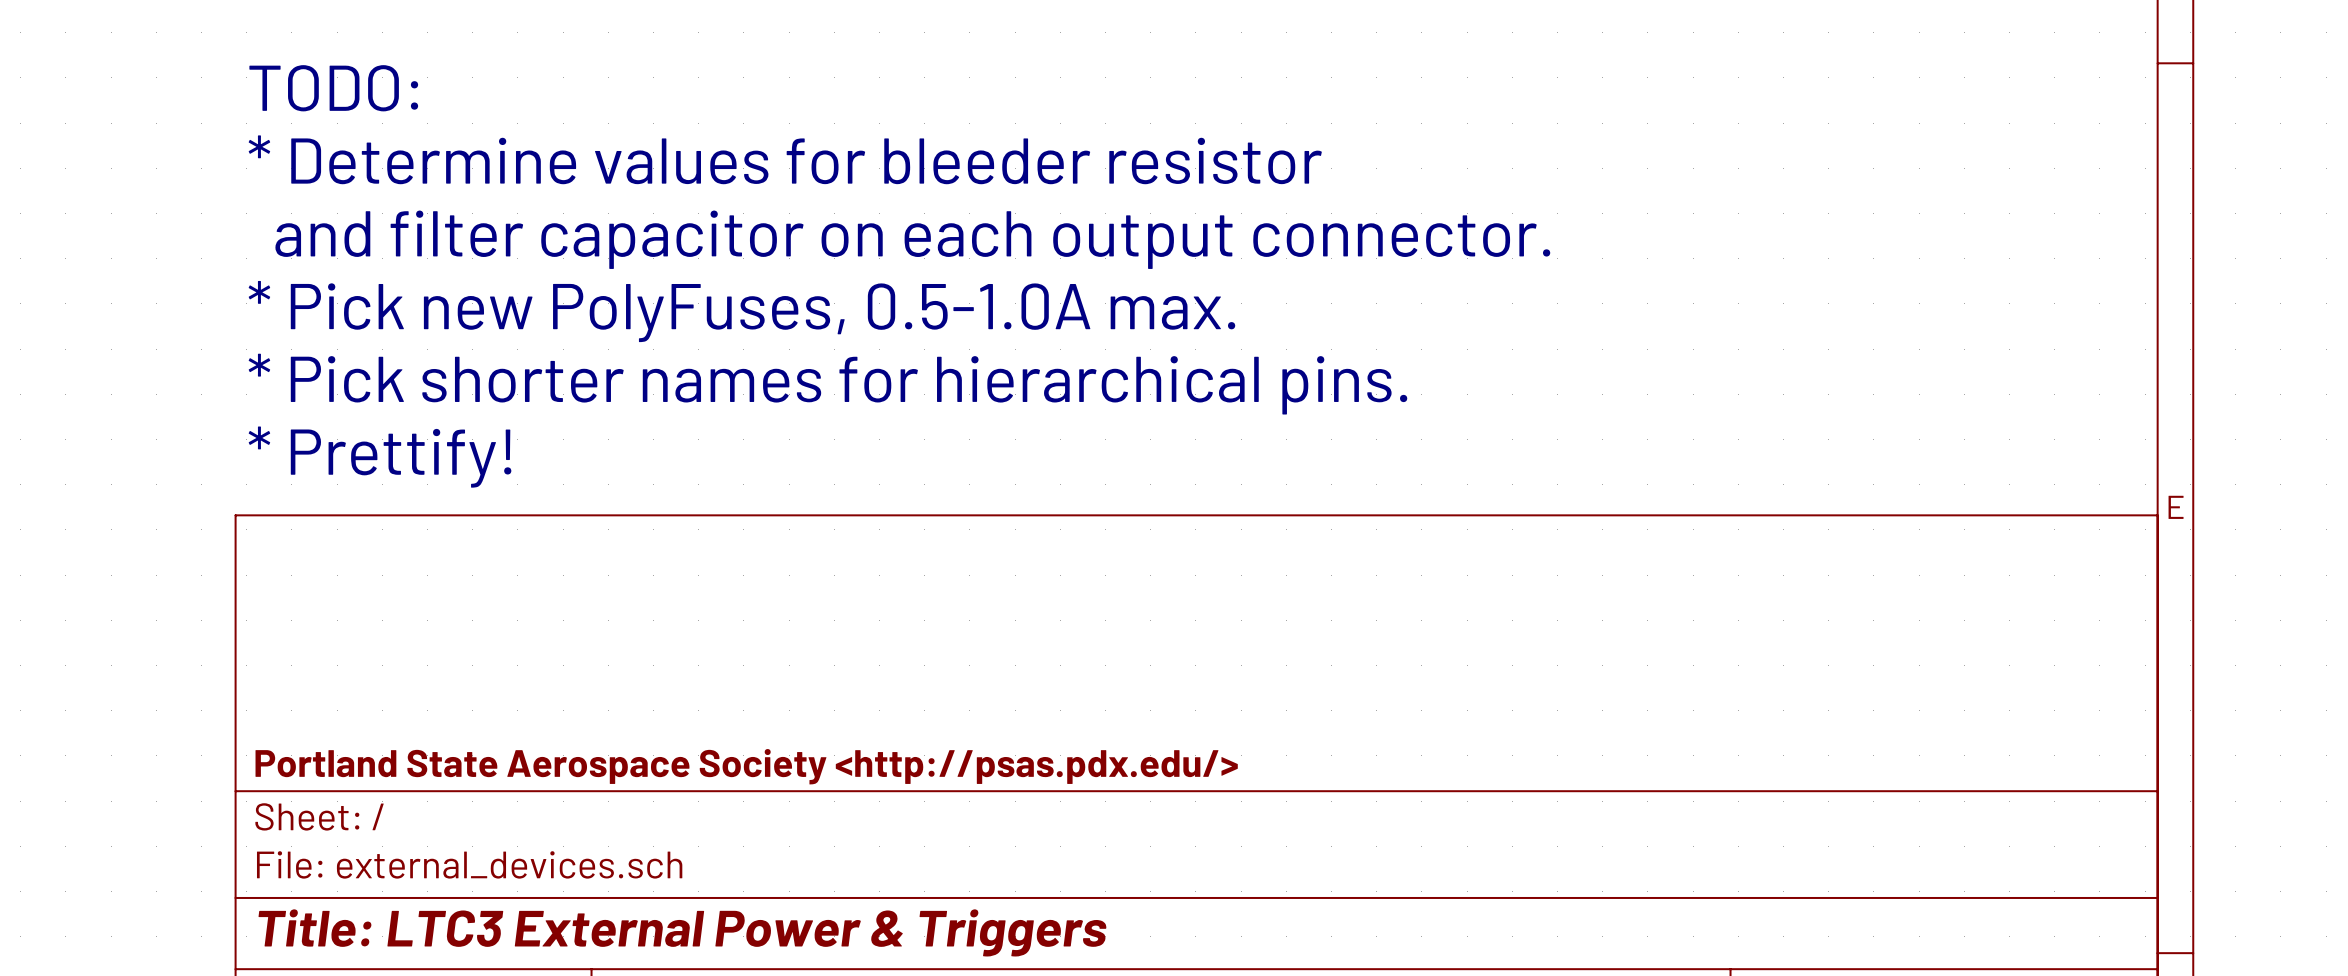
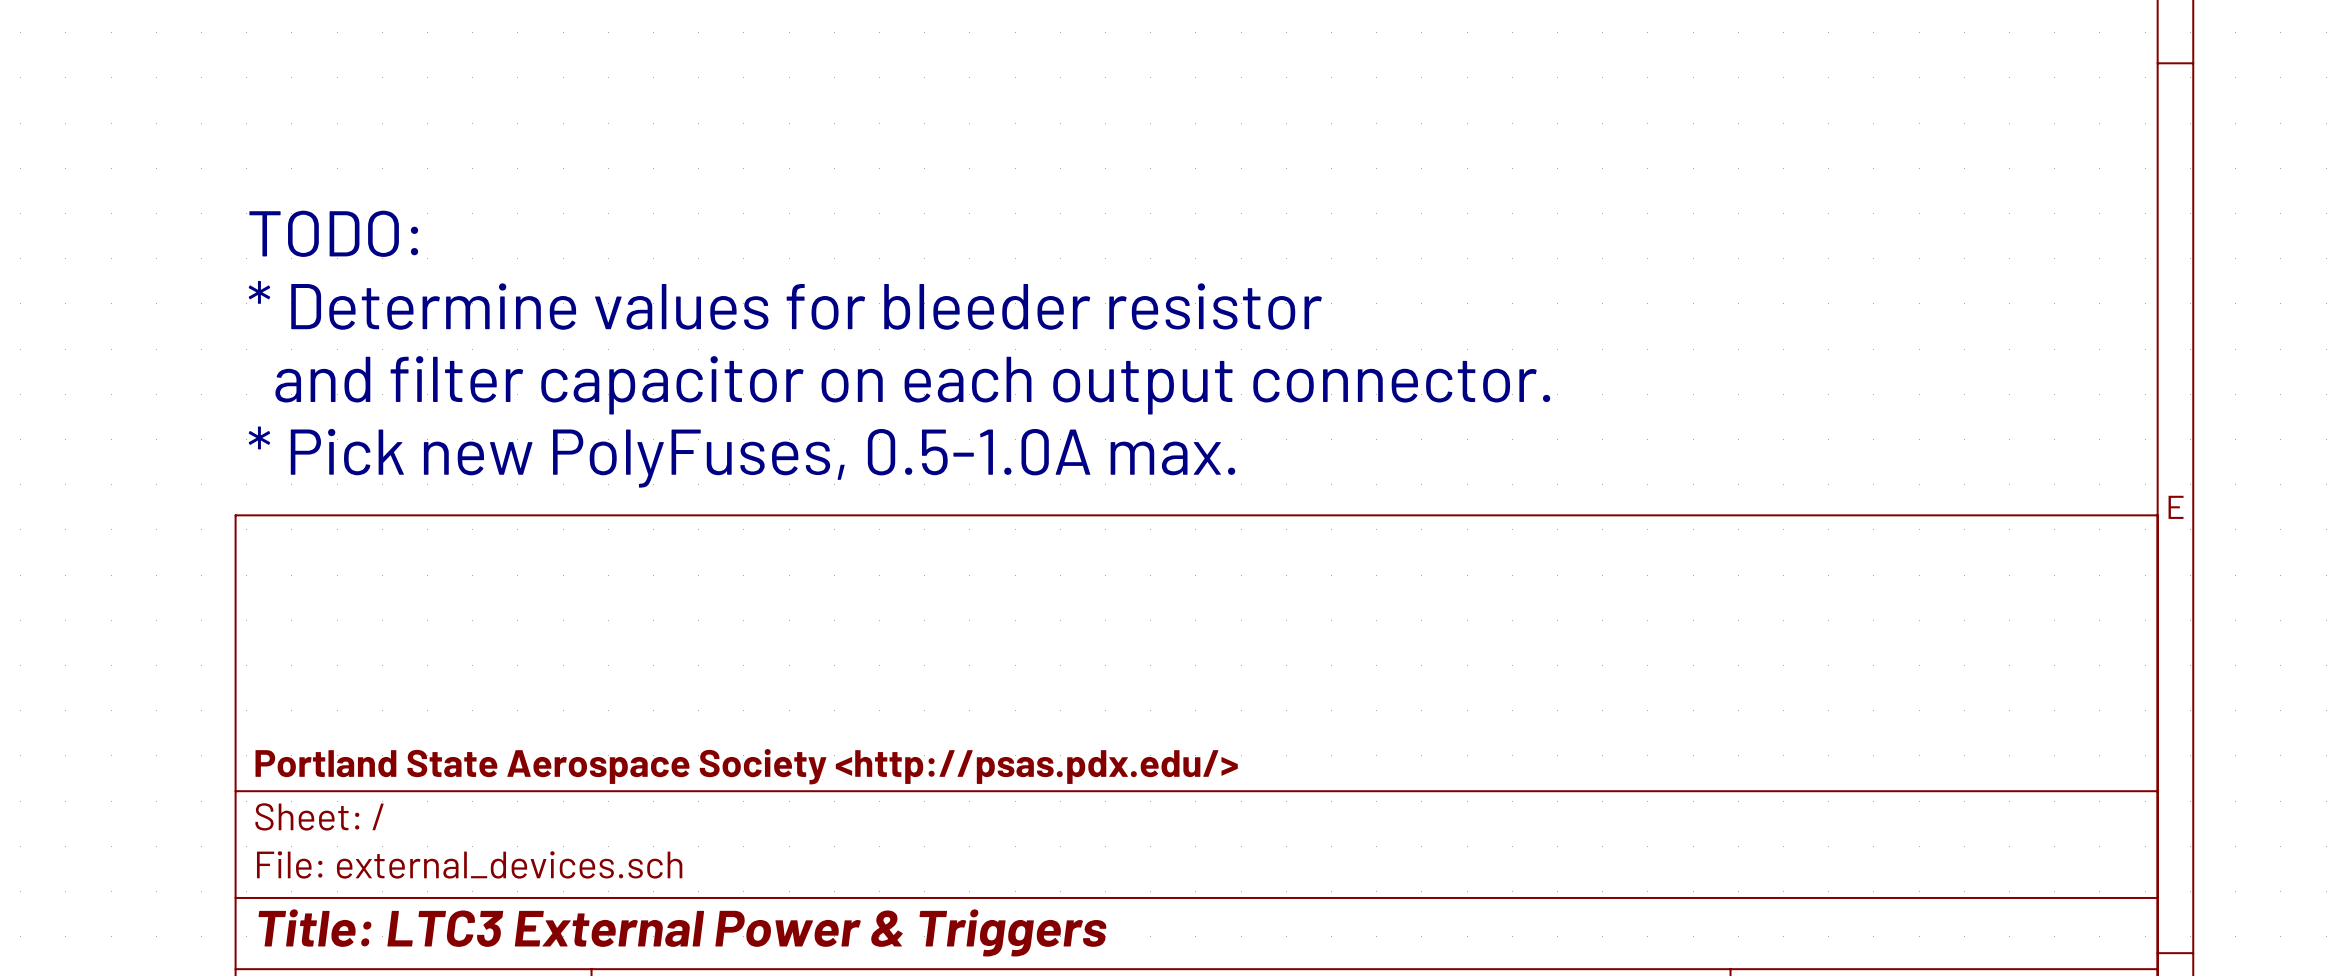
text: TODO: (333, 88) -> none
text: * Determine values for bleeder resistor (785, 159) -> none
text: and filter capacitor on each output connector. (912, 239) -> TODO: (333, 233)
text: * Pick new PolyFuses, 0.5-1.0A max. (741, 311) -> * Determine values for bleeder resistor (785, 305)
text: * Pick shorter names for hierarchical pins. (827, 384) -> and filter capacitor on each output connector. (912, 385)
text: * Prettify! (380, 457) -> * Pick new PolyFuses, 0.5-1.0A max. (741, 457)

